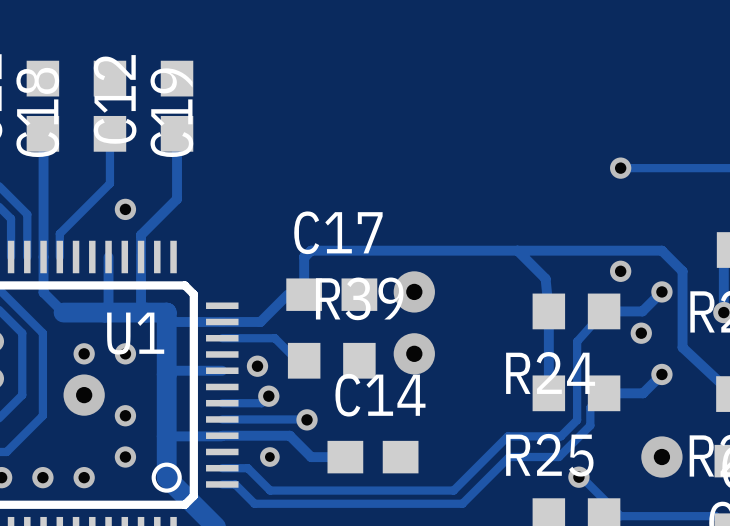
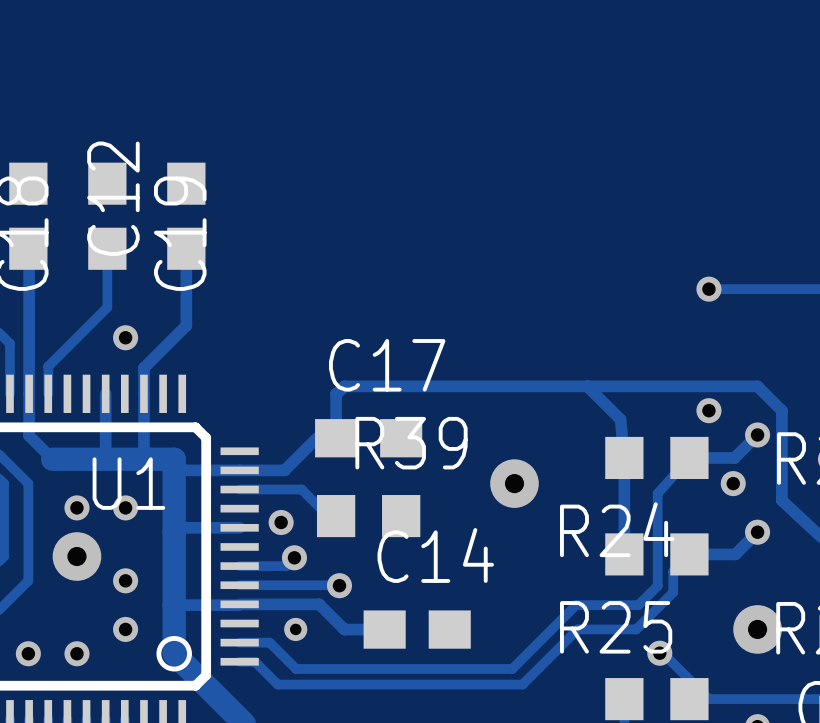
via: (414, 291) -> none
via: none -> (514, 483)
via: (414, 353) -> none

